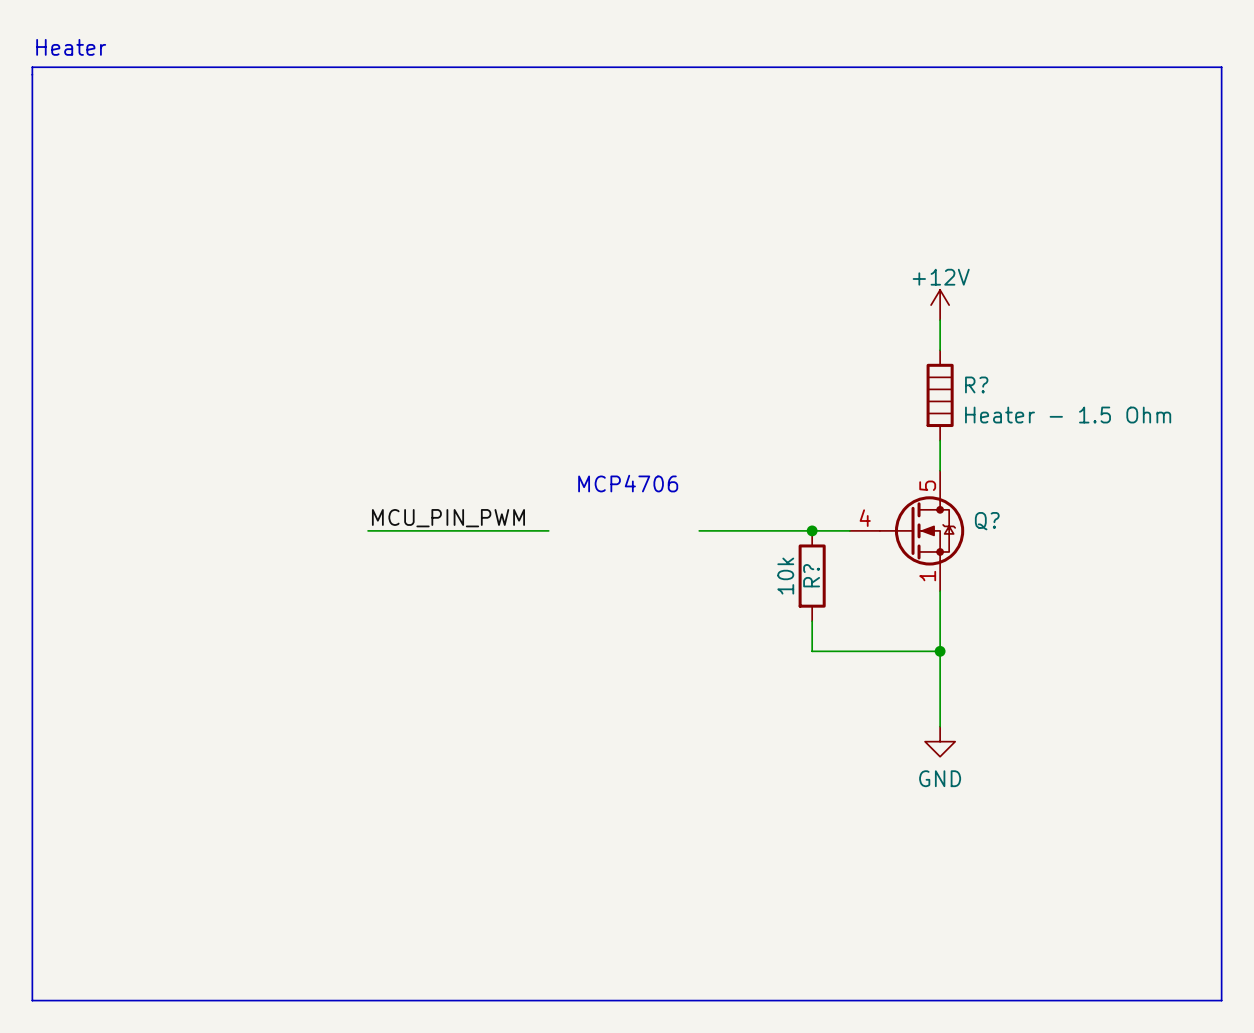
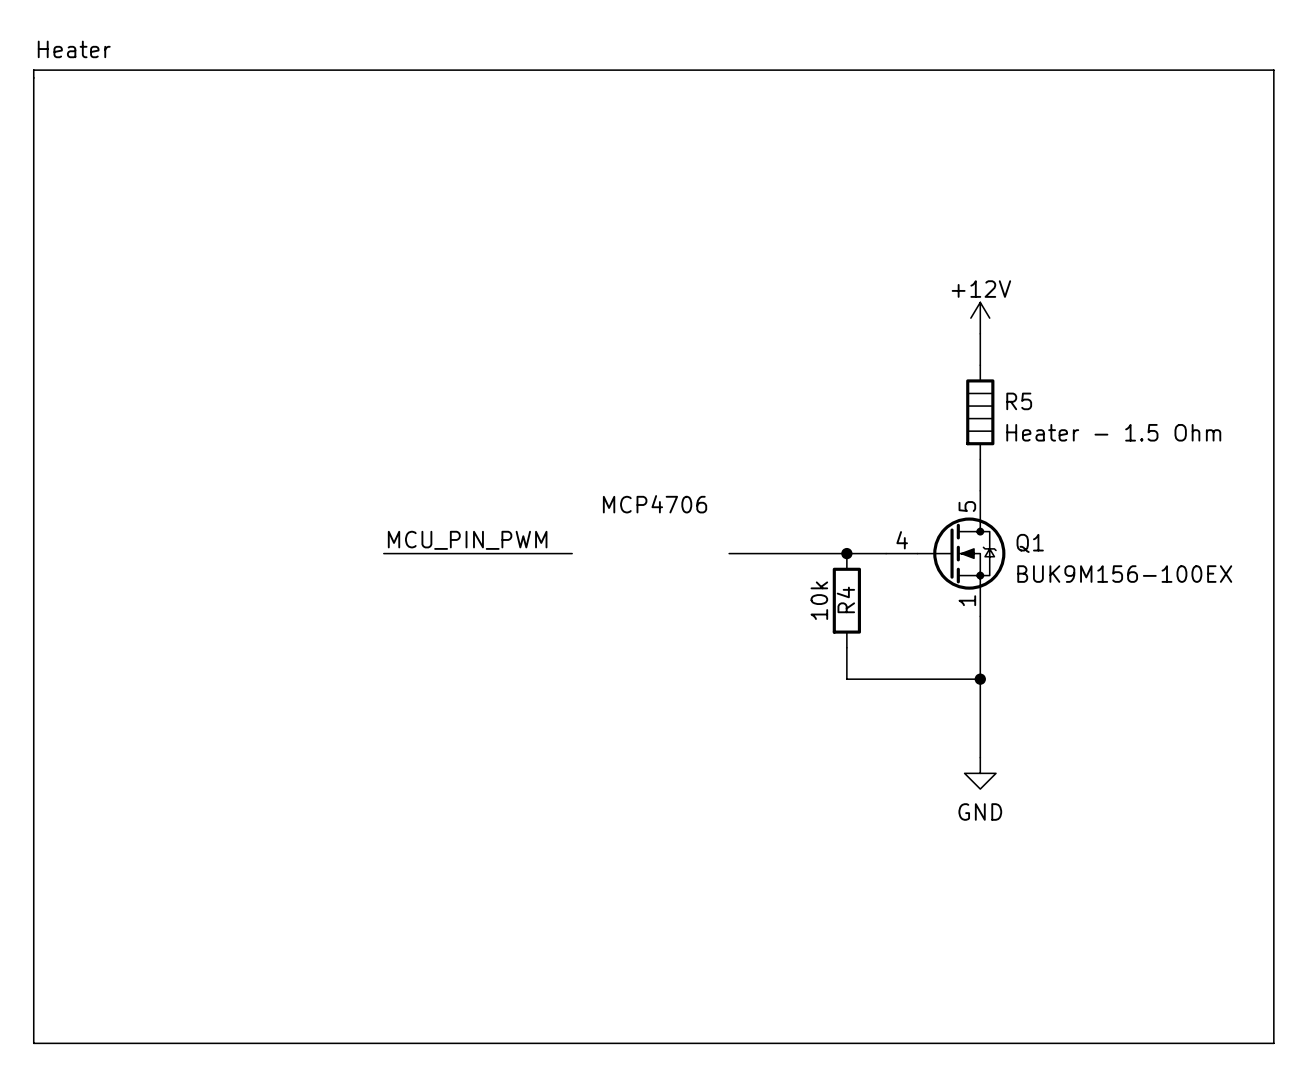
R? name: R? (976, 384) -> R5 (1019, 401)
Q? name: Q? (987, 521) -> Q1 (1030, 543)
Q? value: none -> BUK9M156-100EX (1124, 574)
R? name: R? (811, 575) -> R4 (845, 599)

